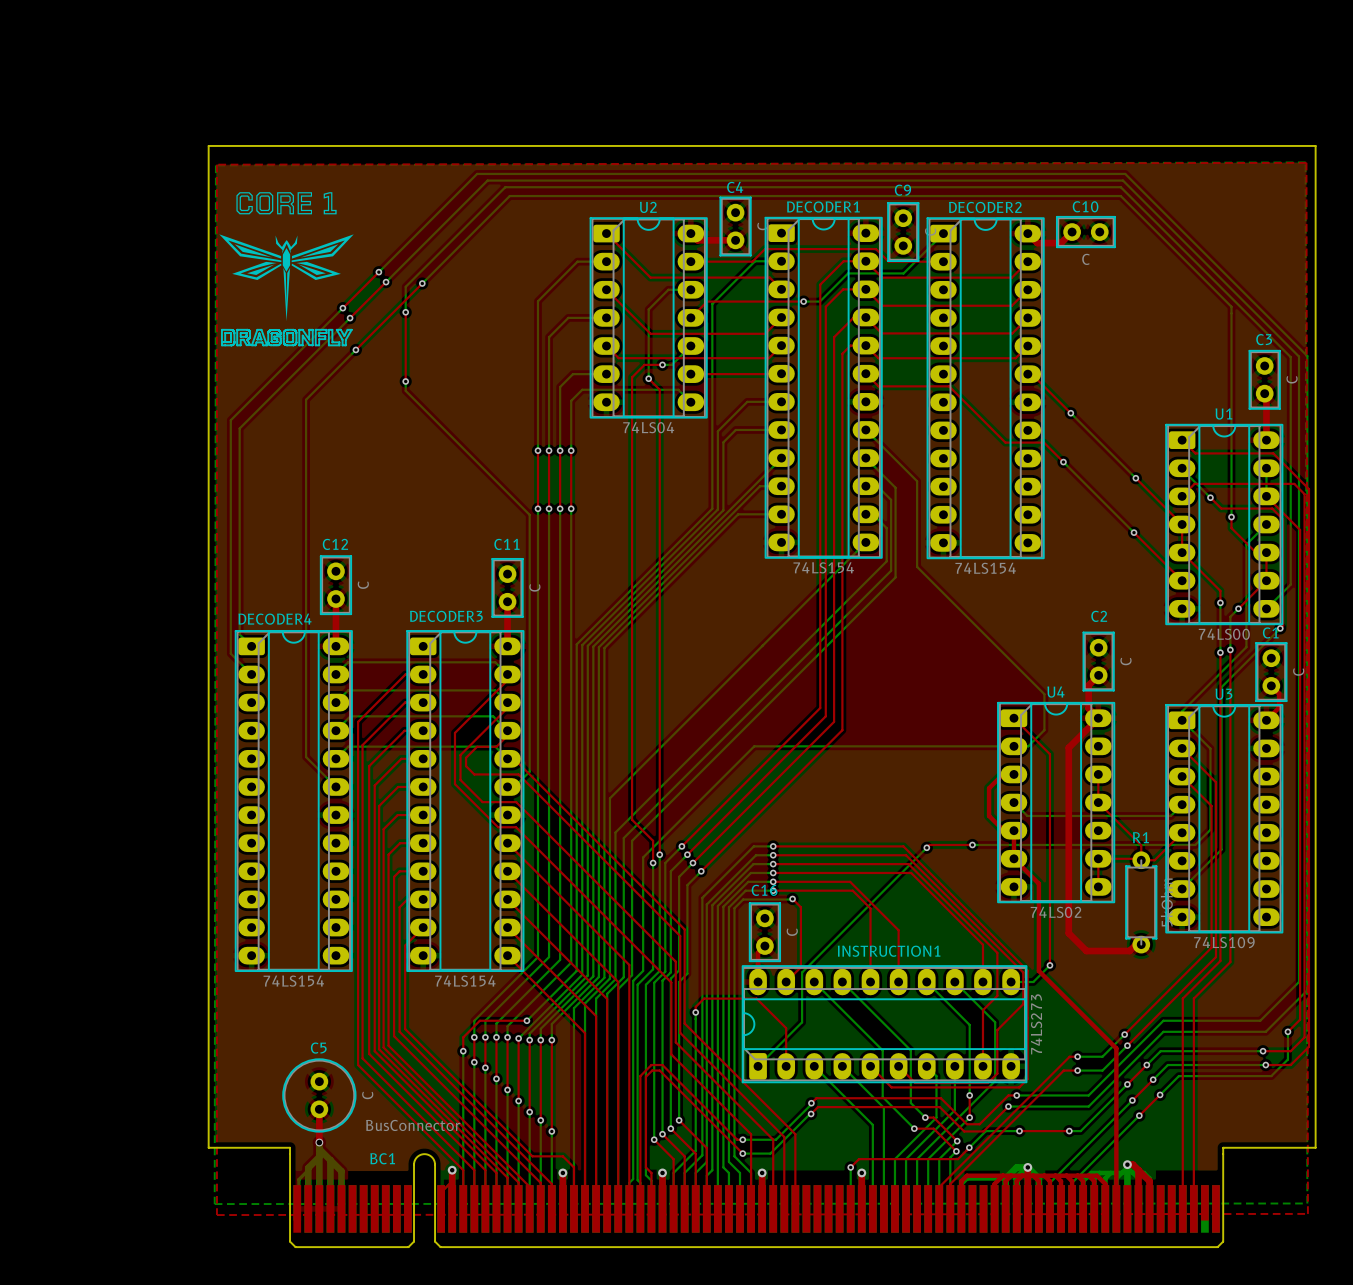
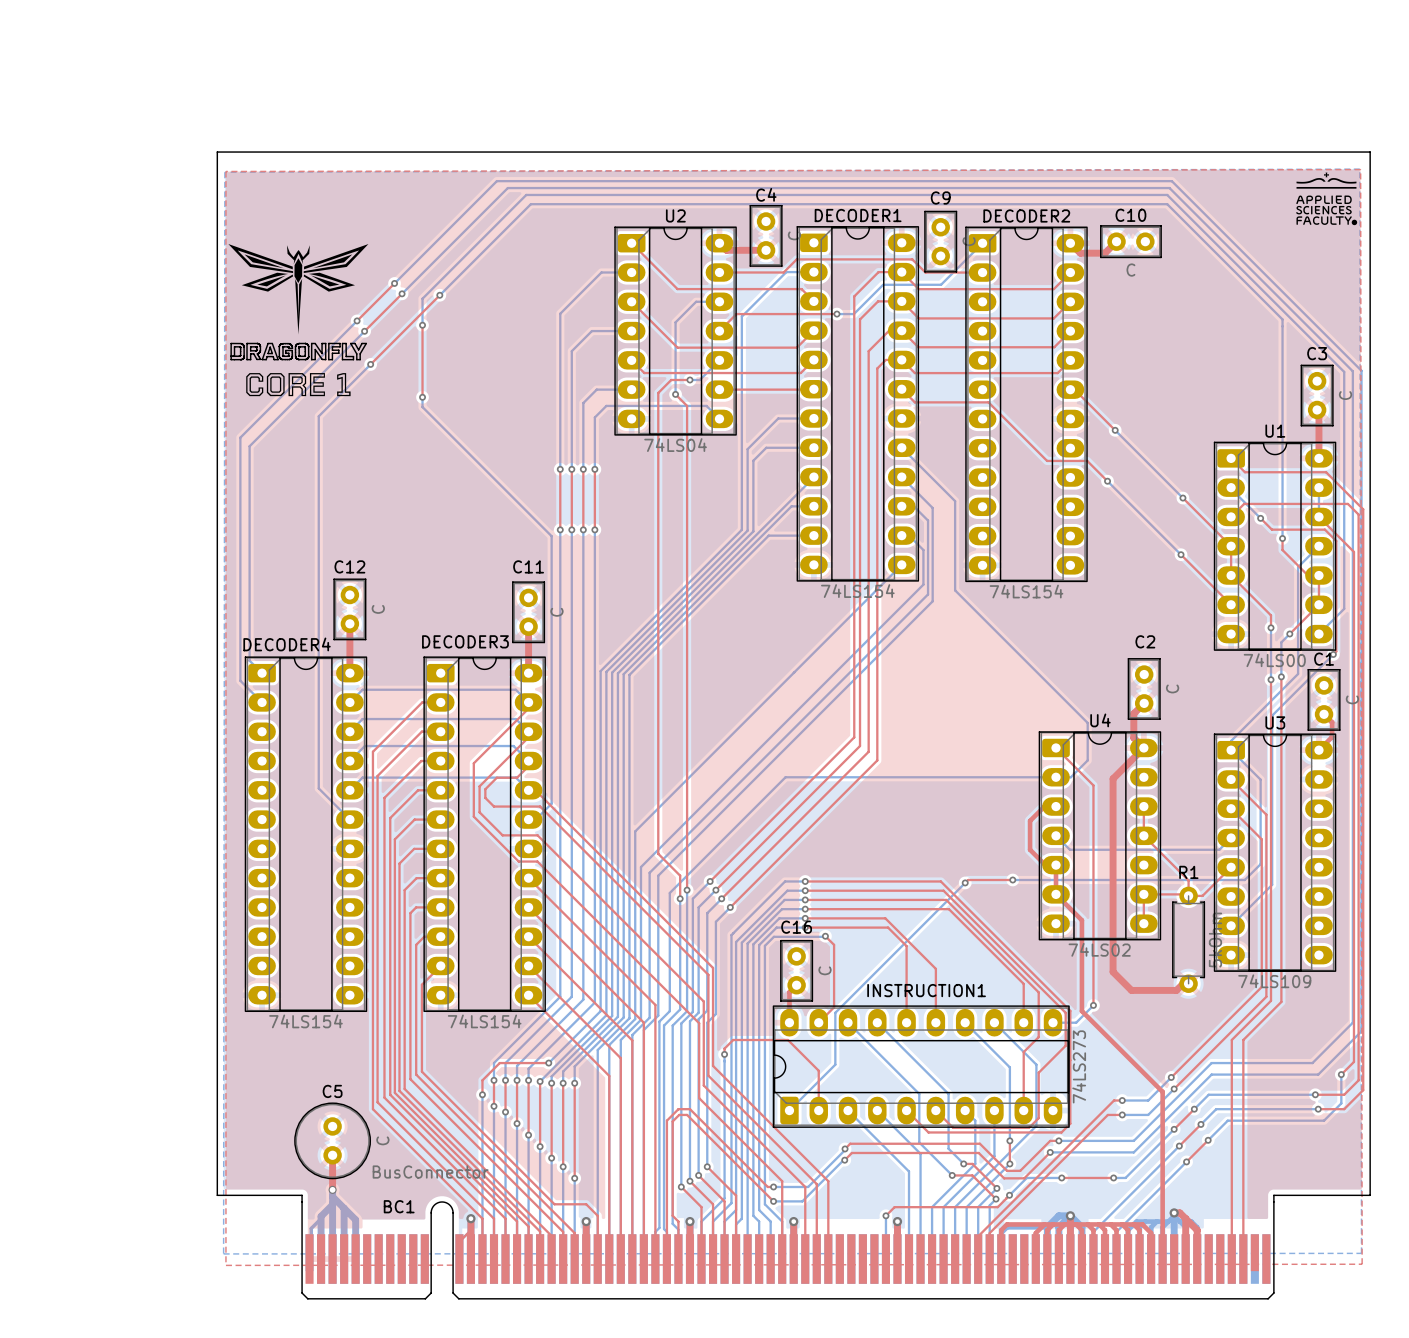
drawing: none -> [1296, 172, 1358, 226]
drawing position: (286, 203) -> (298, 384)

